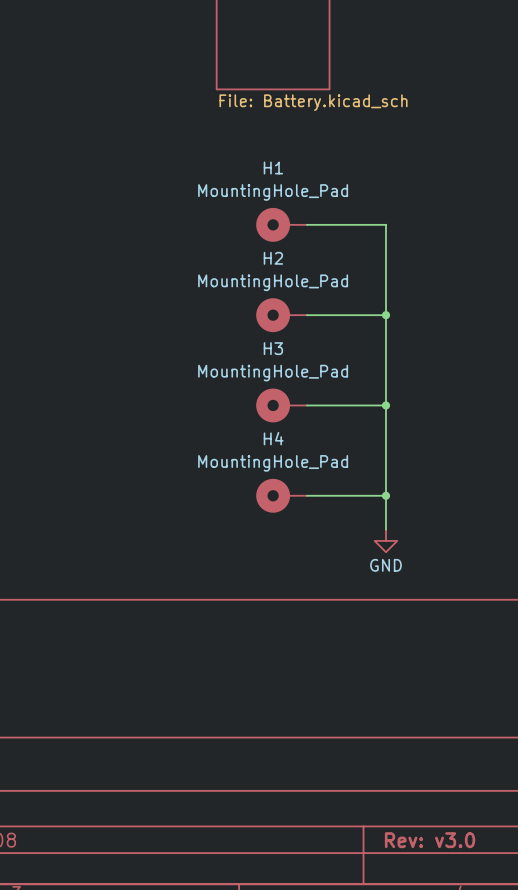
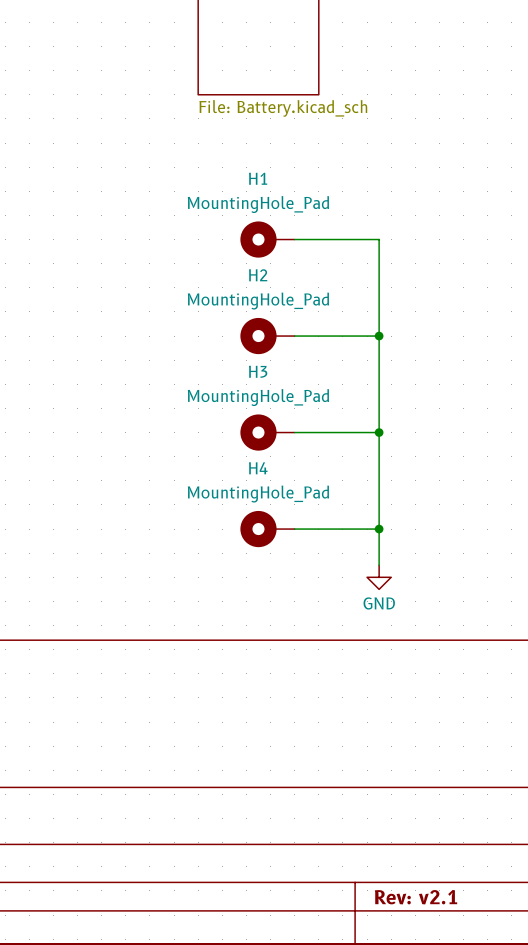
title block: Rev: v3.0 (430, 840) -> Rev: v2.1 (416, 897)

